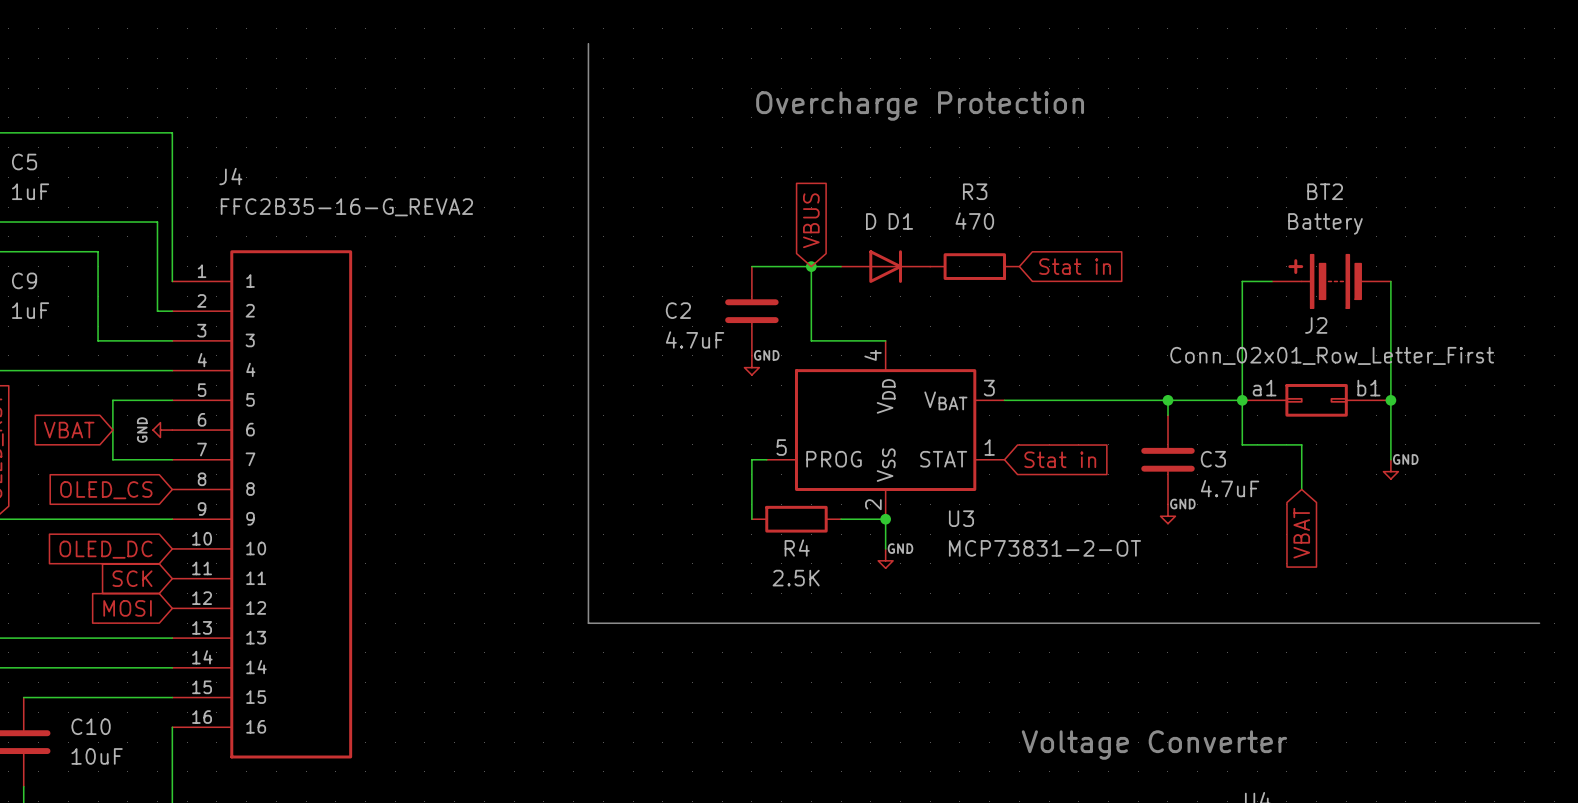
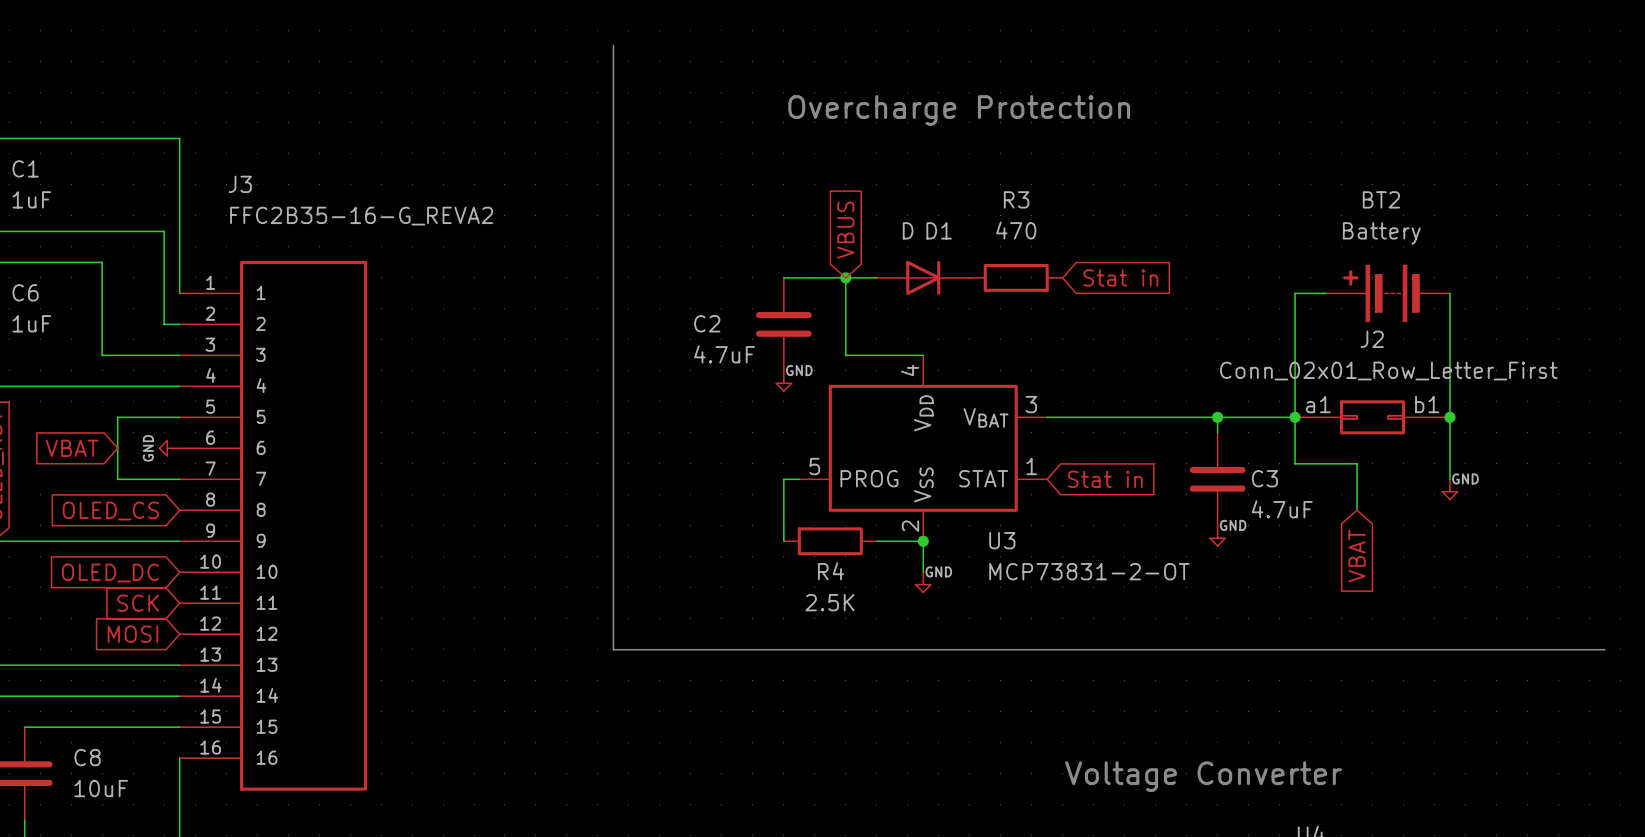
C5 name: C5 (24, 162) -> C1 (25, 168)
J4 name: J4 (230, 176) -> J3 (240, 184)
C9 name: C9 (24, 280) -> C6 (25, 292)
C10 name: C10 (91, 726) -> C8 (87, 757)

